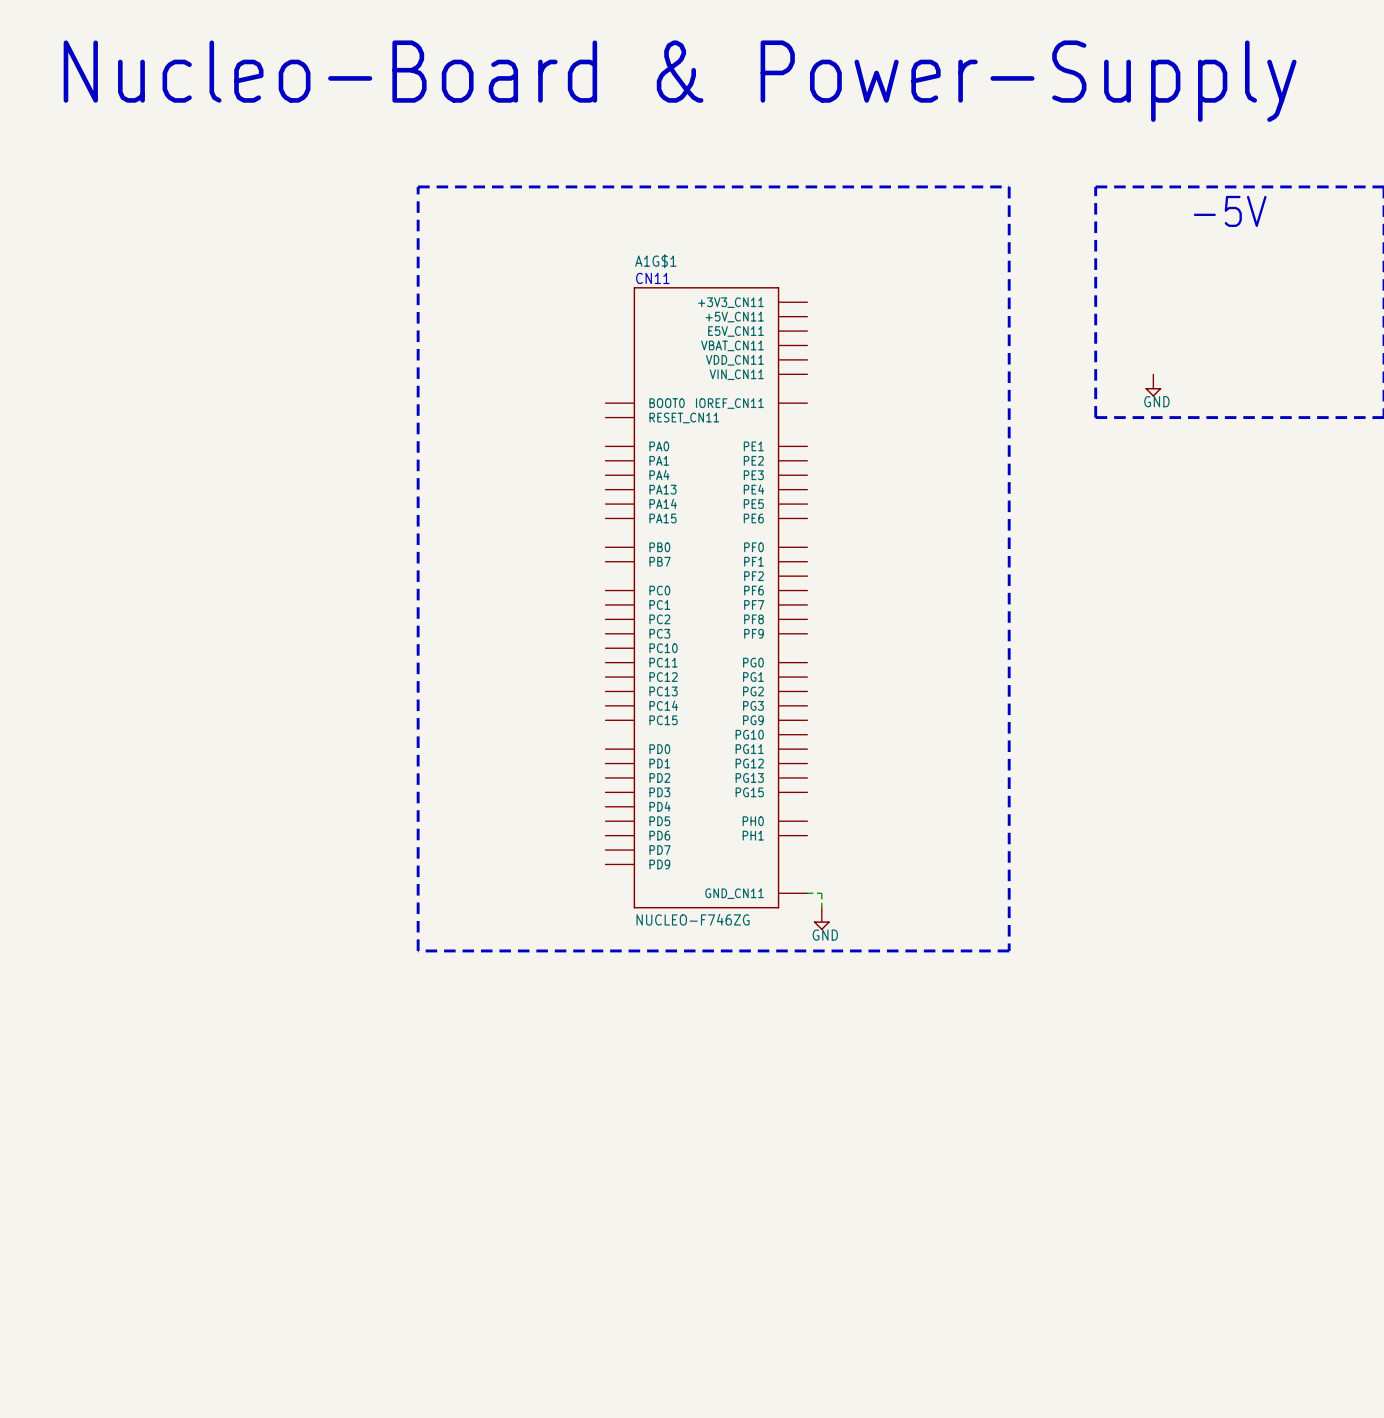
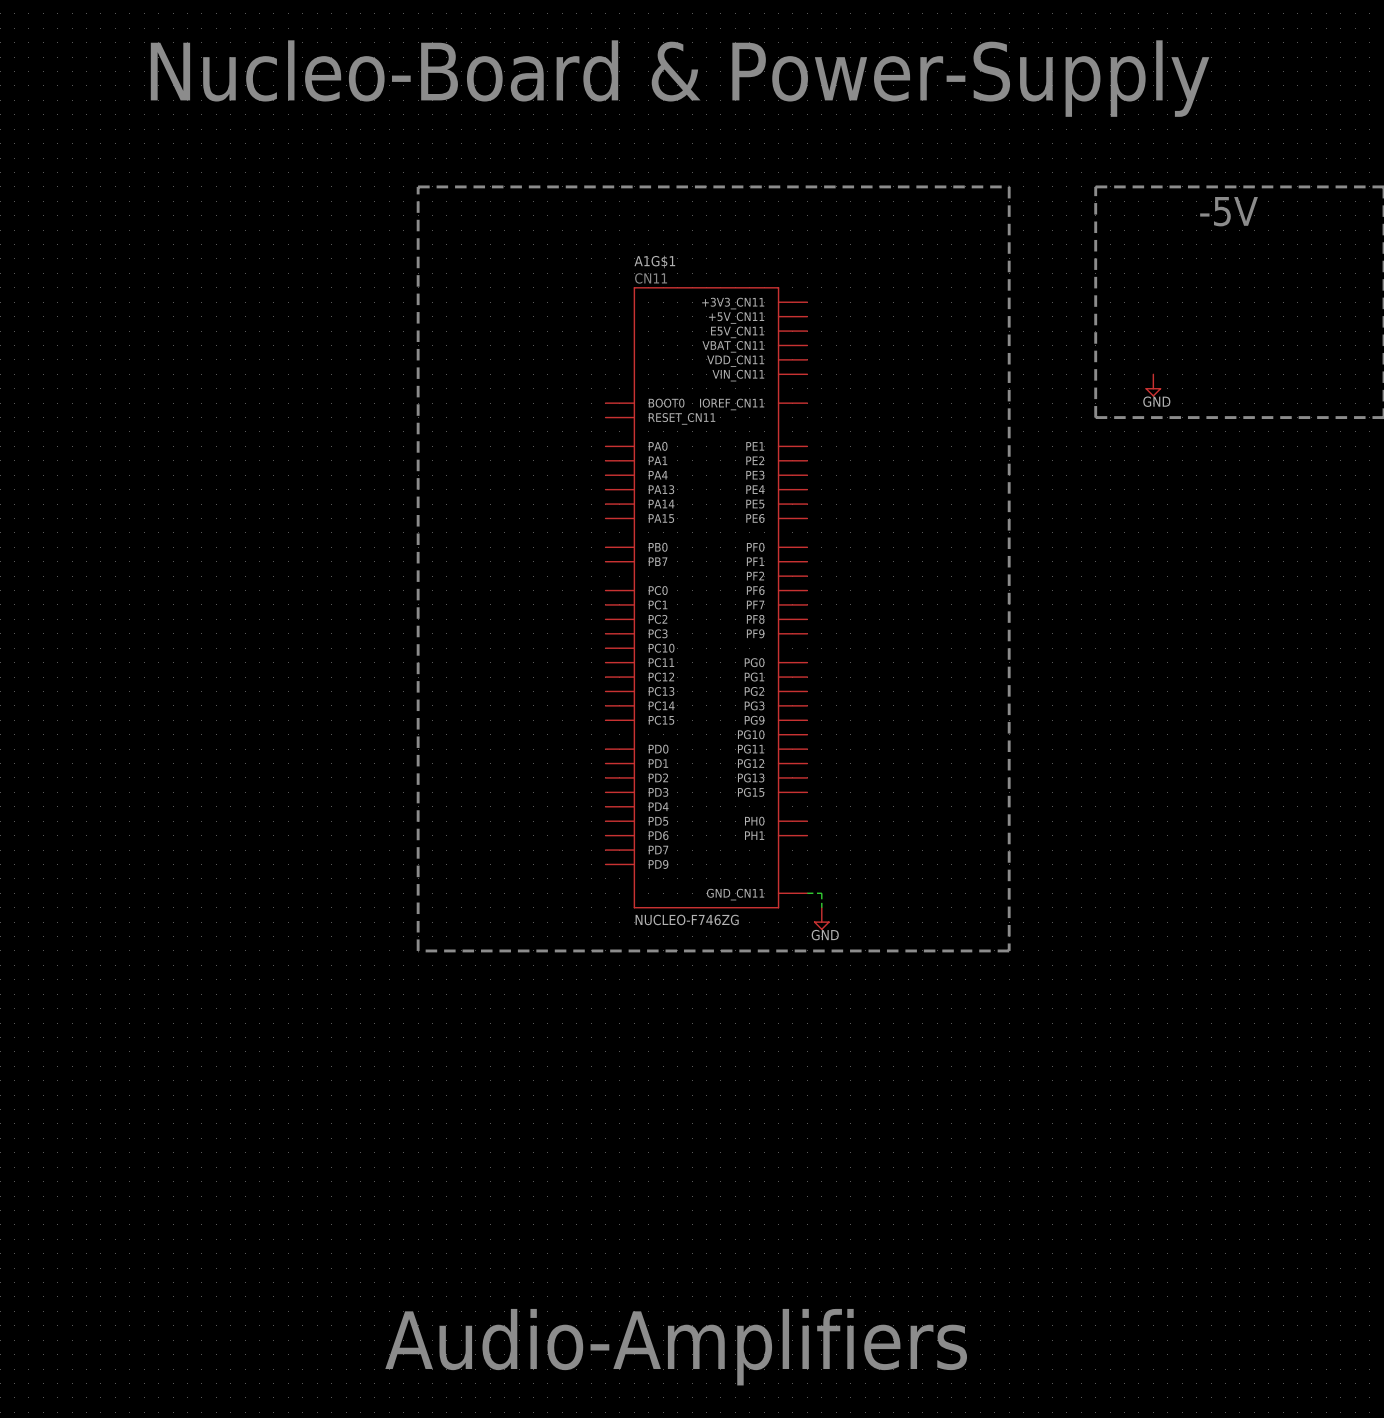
text: none -> Audio-Amplifiers (676, 1347)

